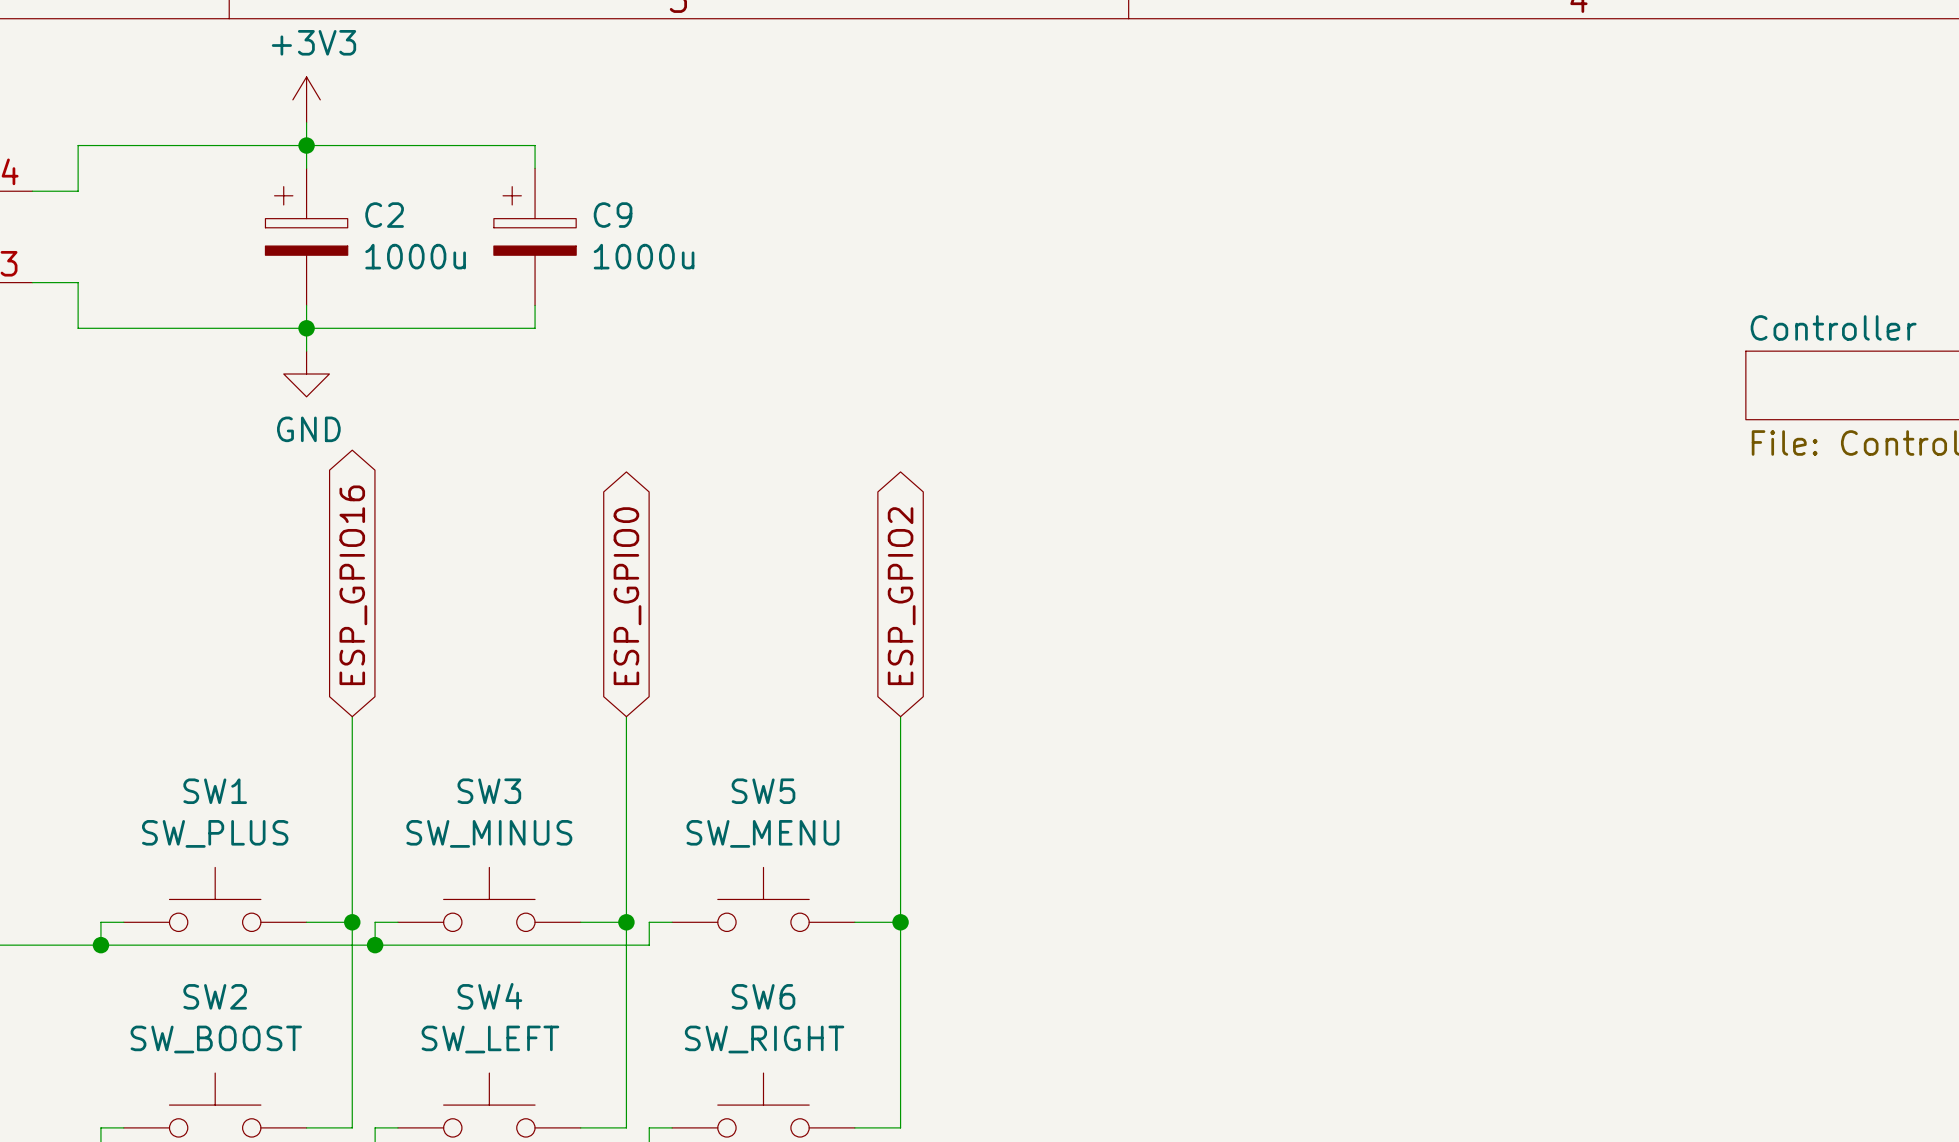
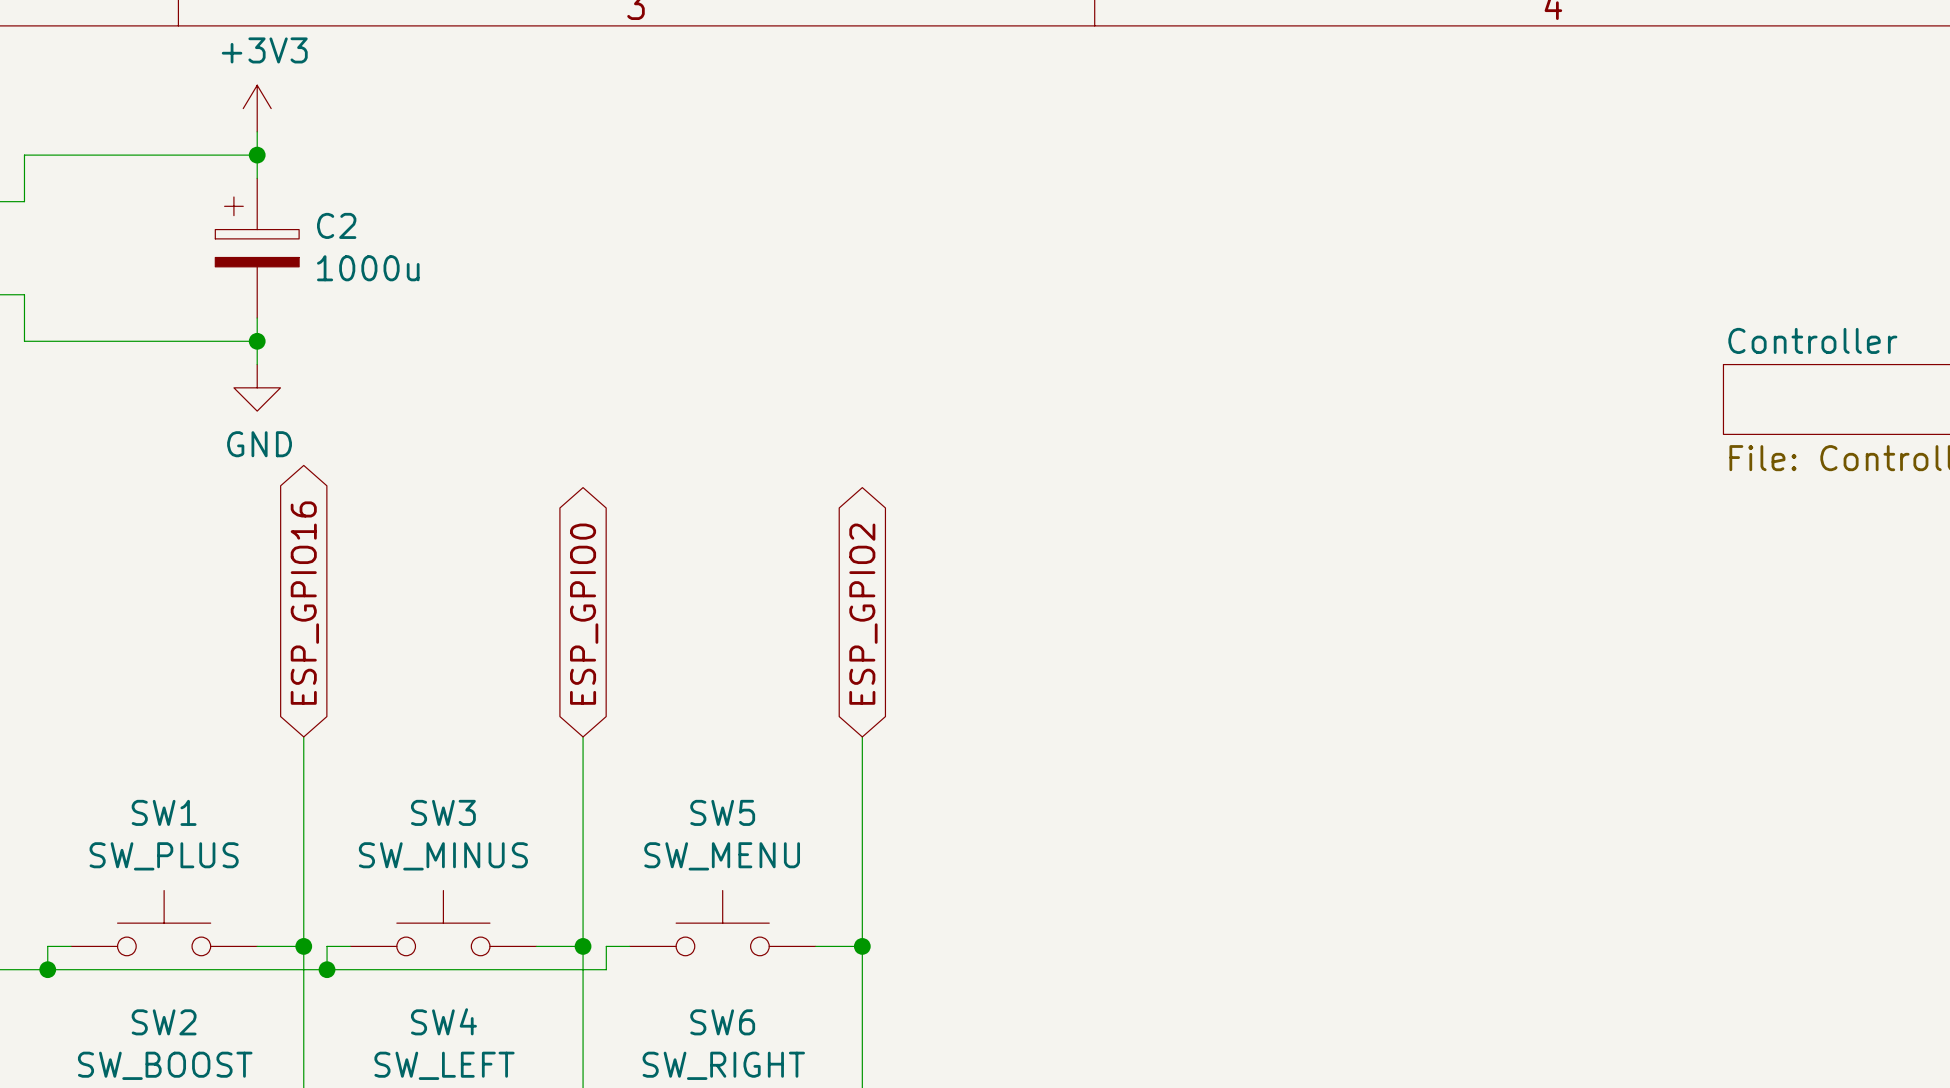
wire: (306, 145) (535, 145) (535, 168) -> none
C9: 1000u (535, 236) -> none
wire: (535, 305) (535, 328) (306, 328) -> none

